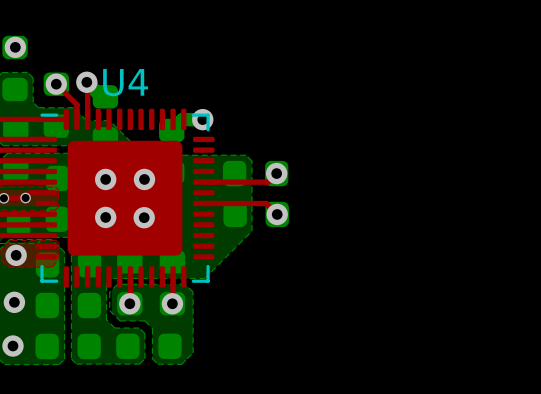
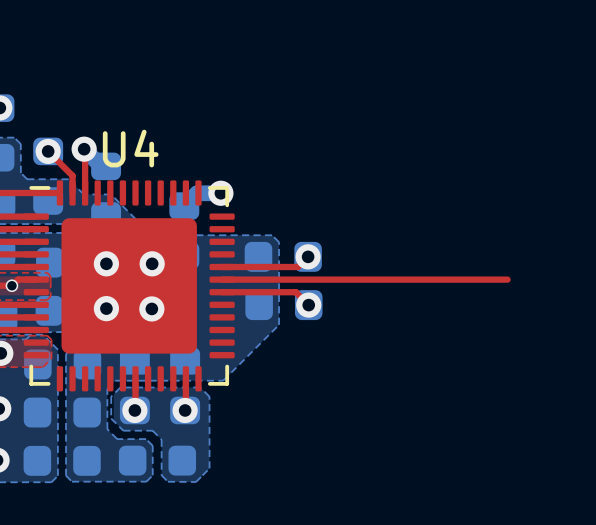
top track: none -> (222, 279) (507, 279)

